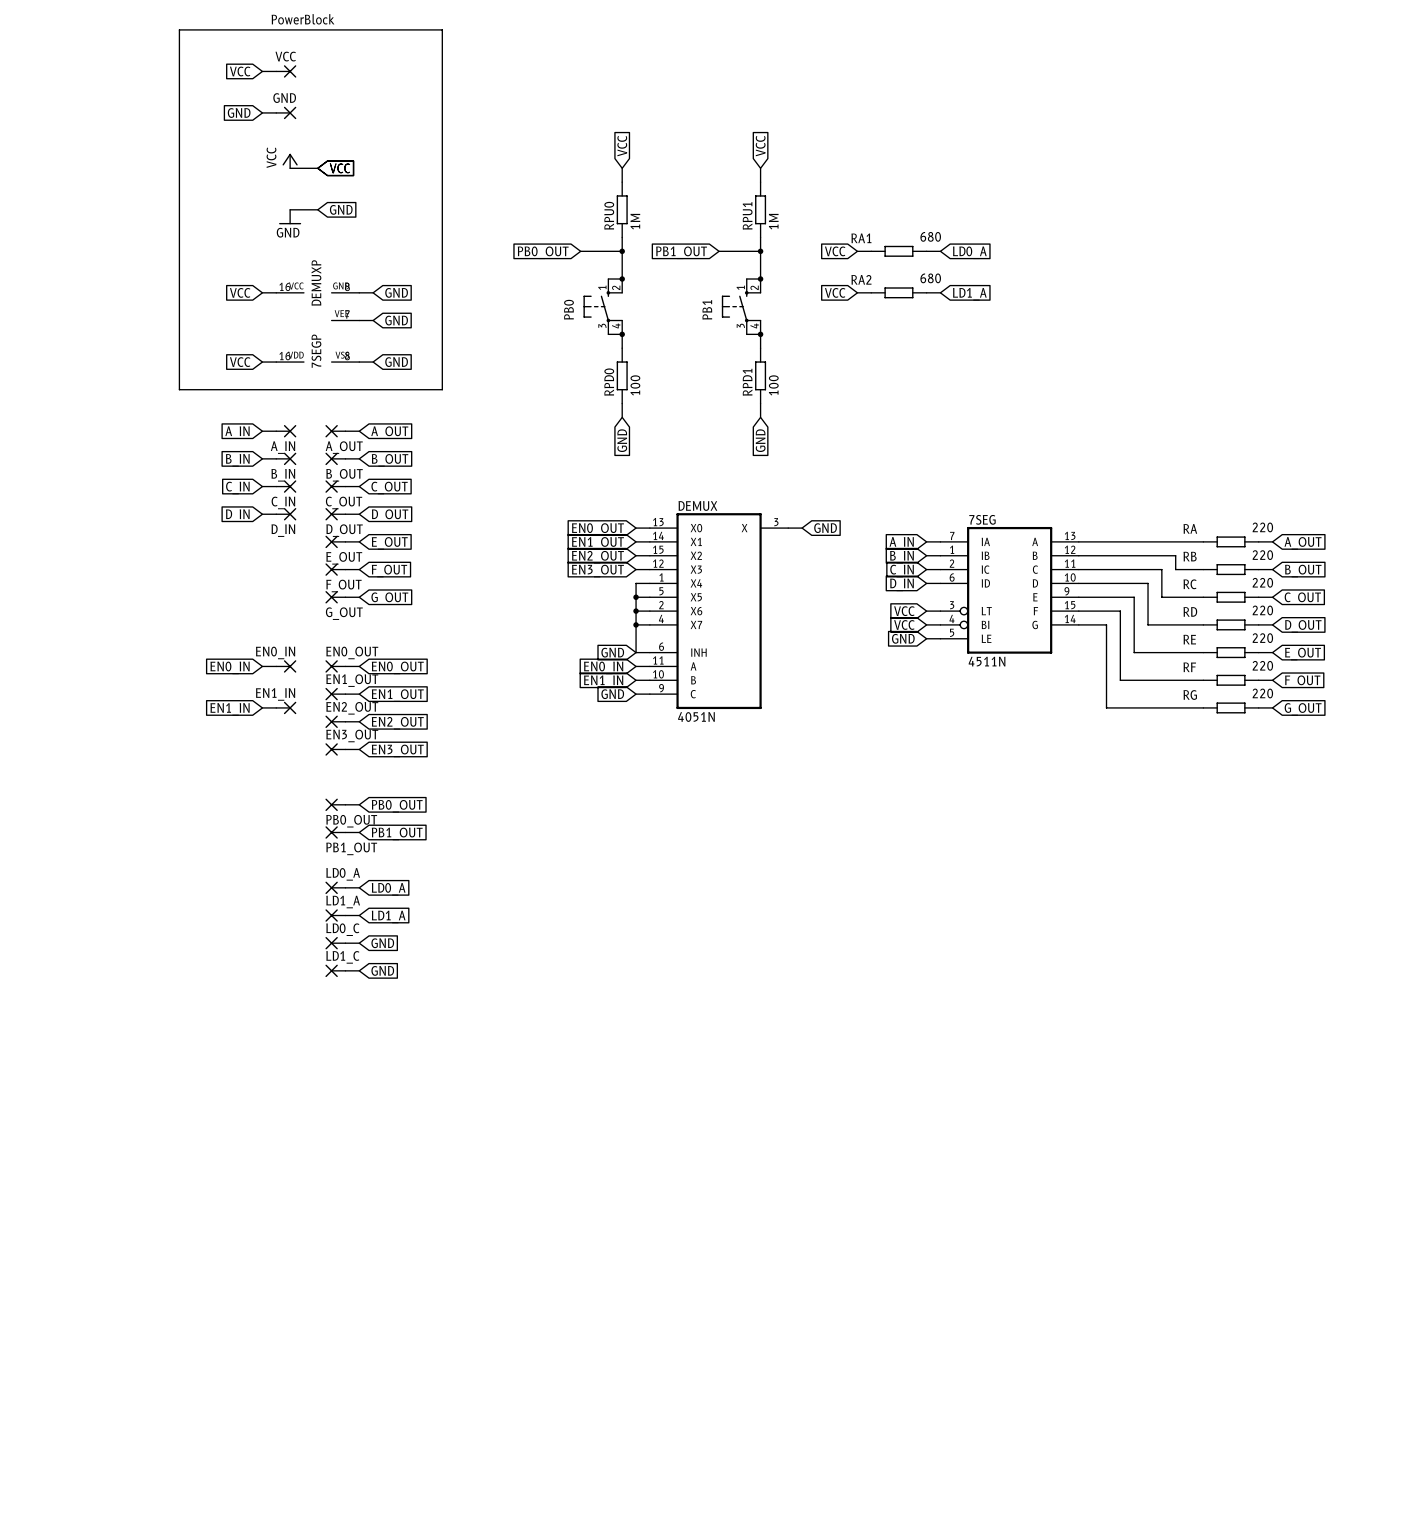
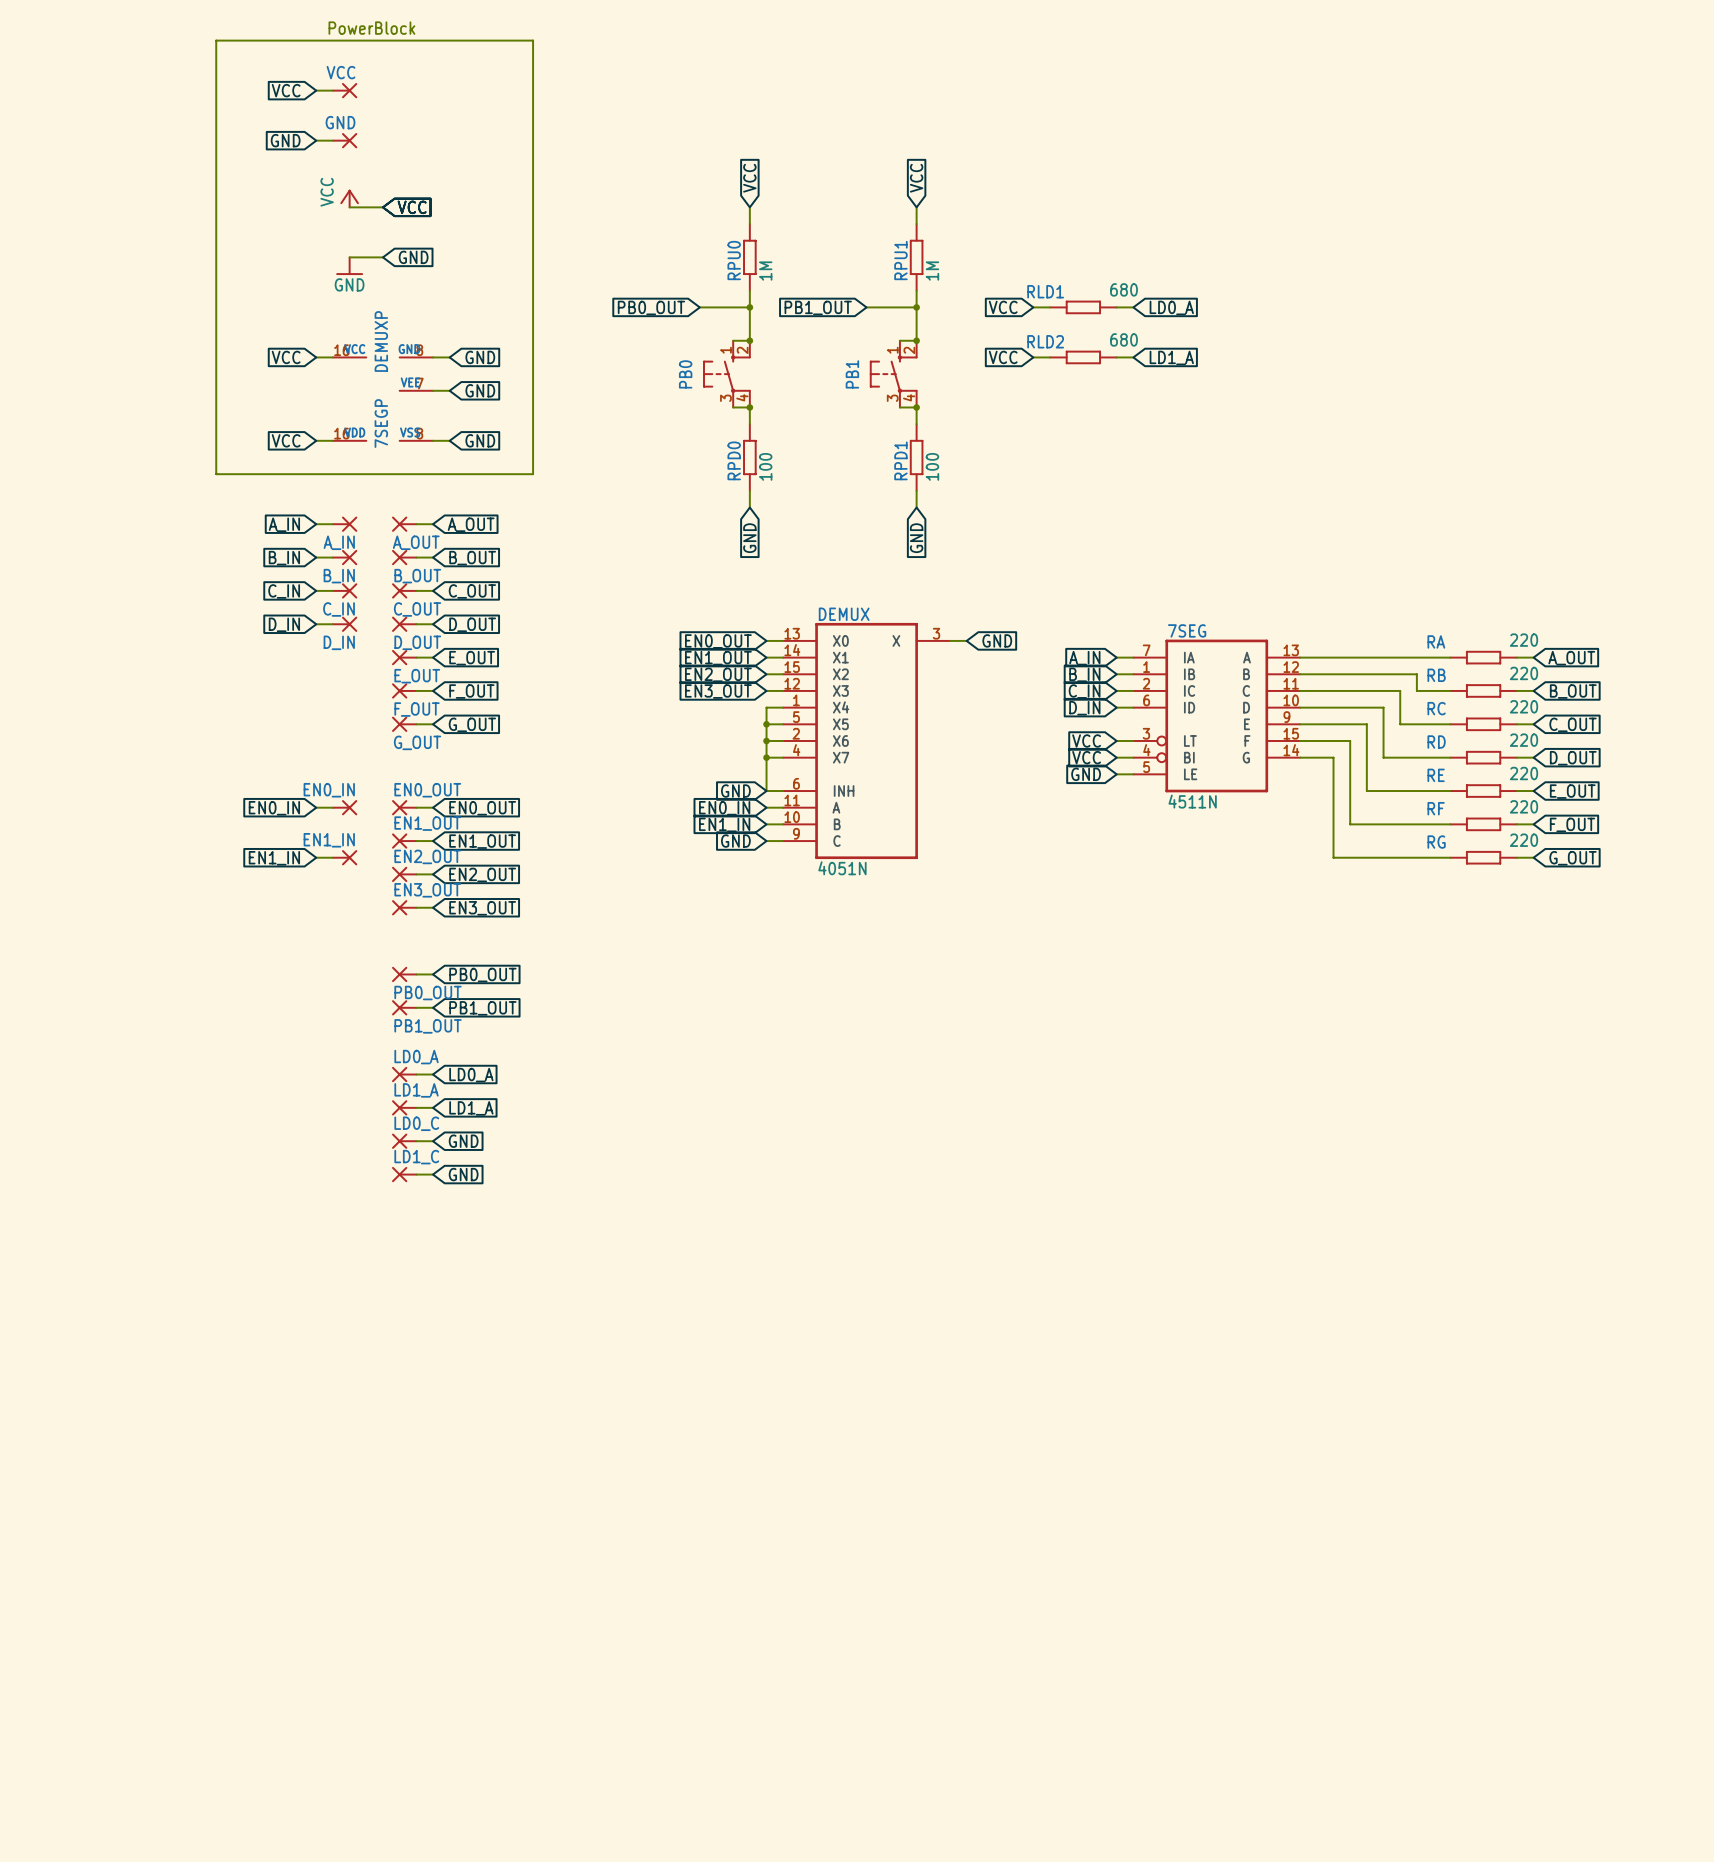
RA1 name: RA1 (861, 238) -> RLD1 (1045, 291)
RA2 name: RA2 (861, 279) -> RLD2 (1045, 341)

